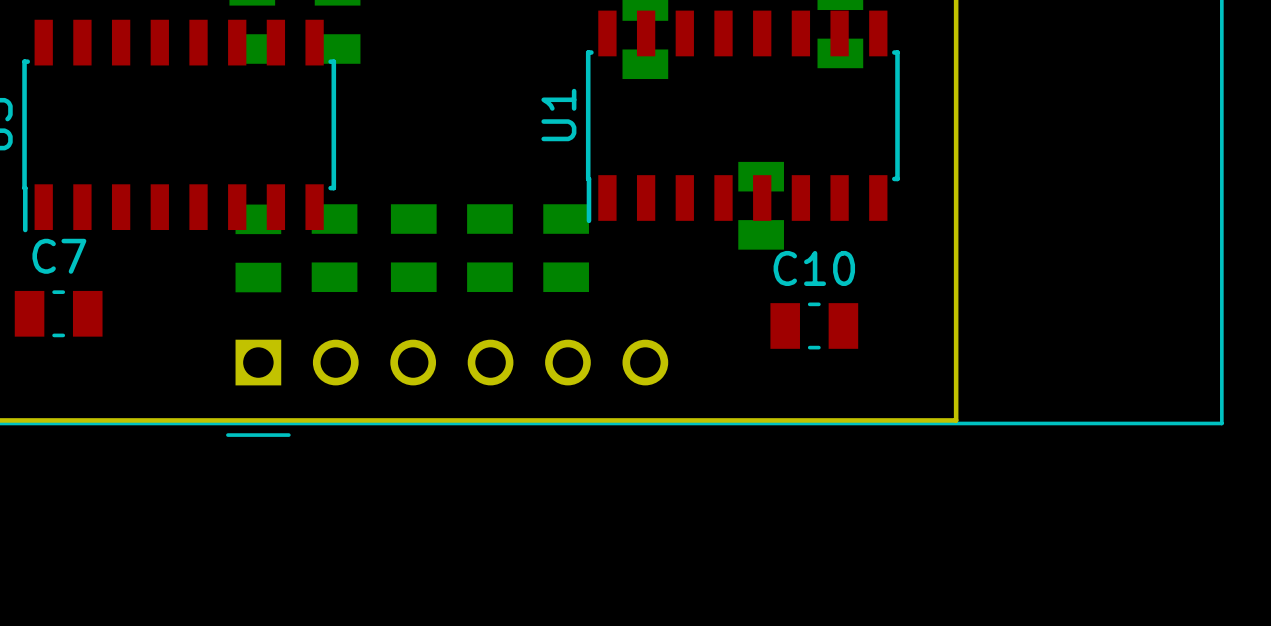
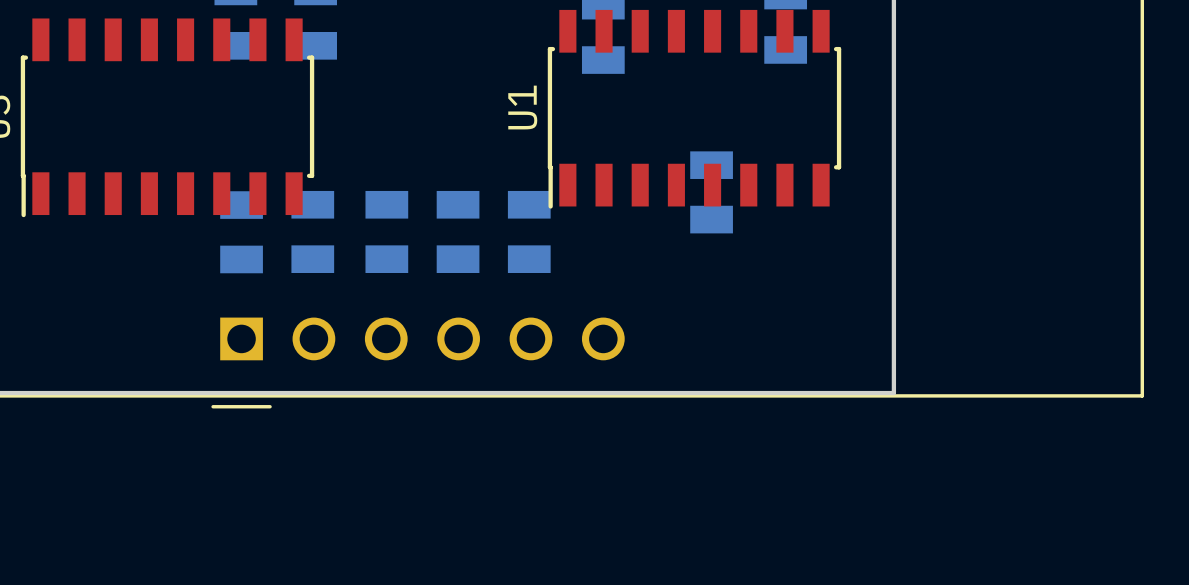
C7: (58, 313) -> none
C10: (814, 325) -> none

